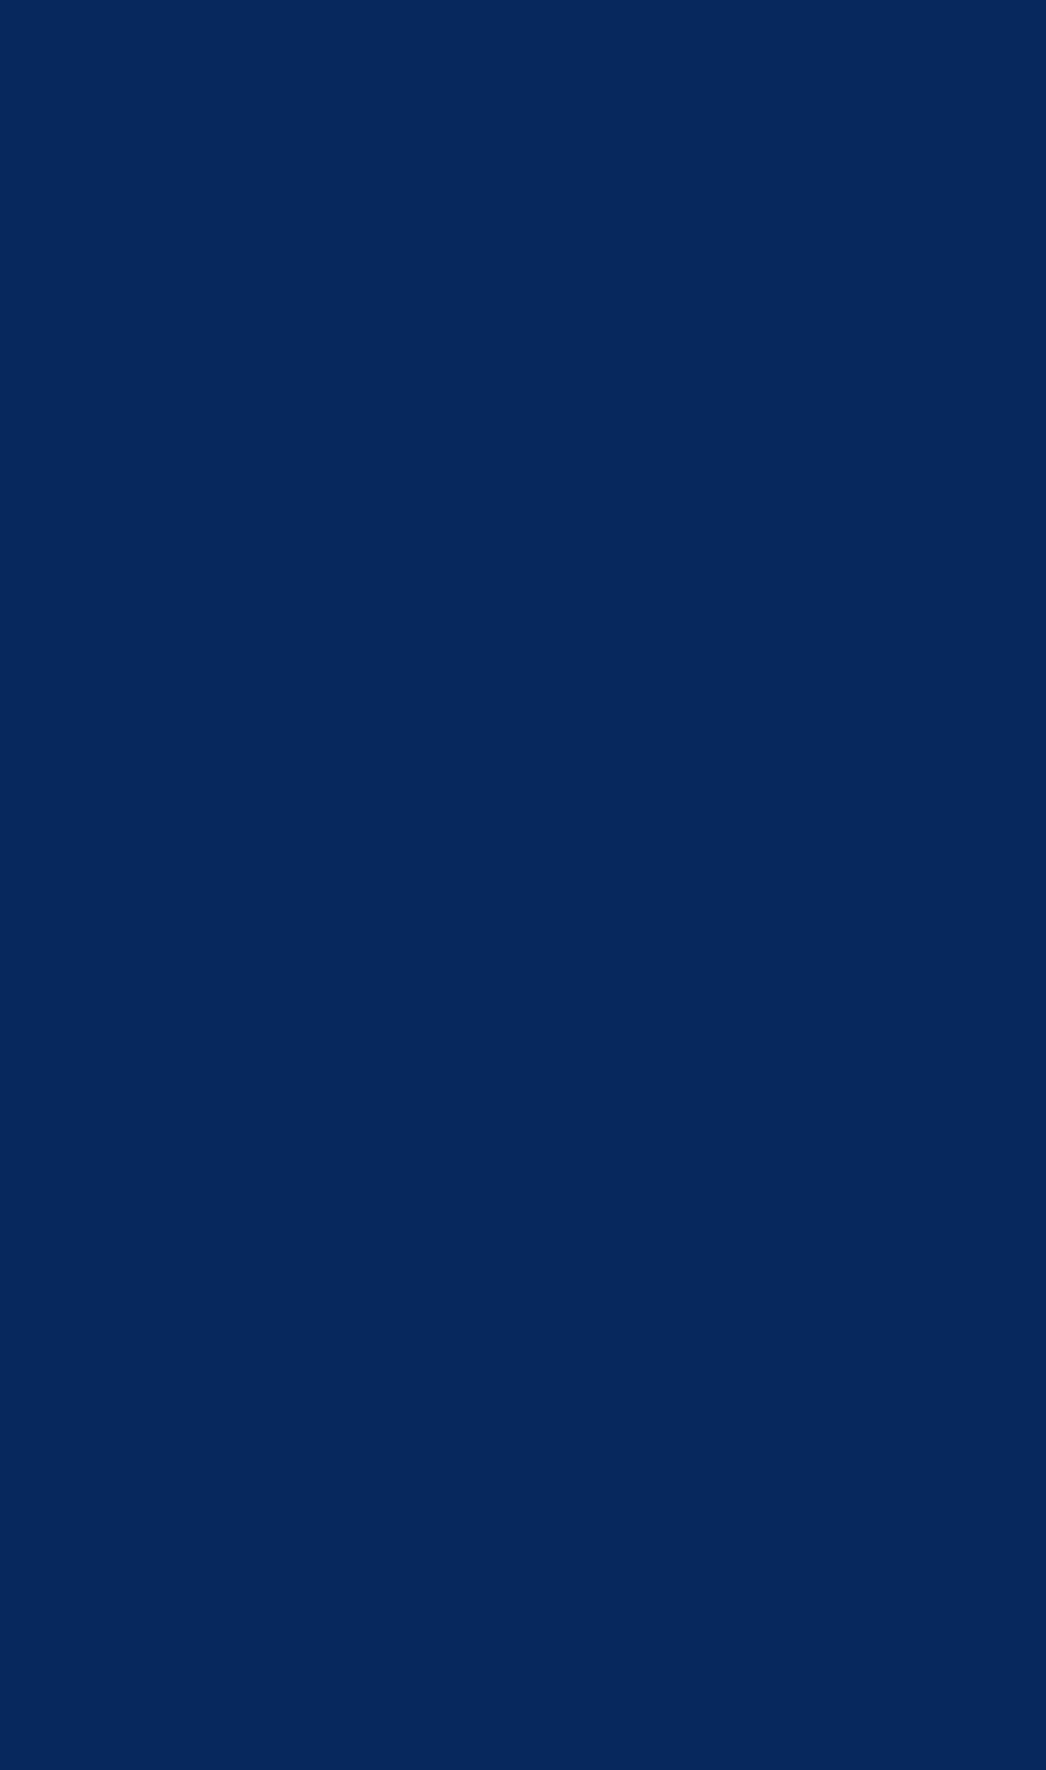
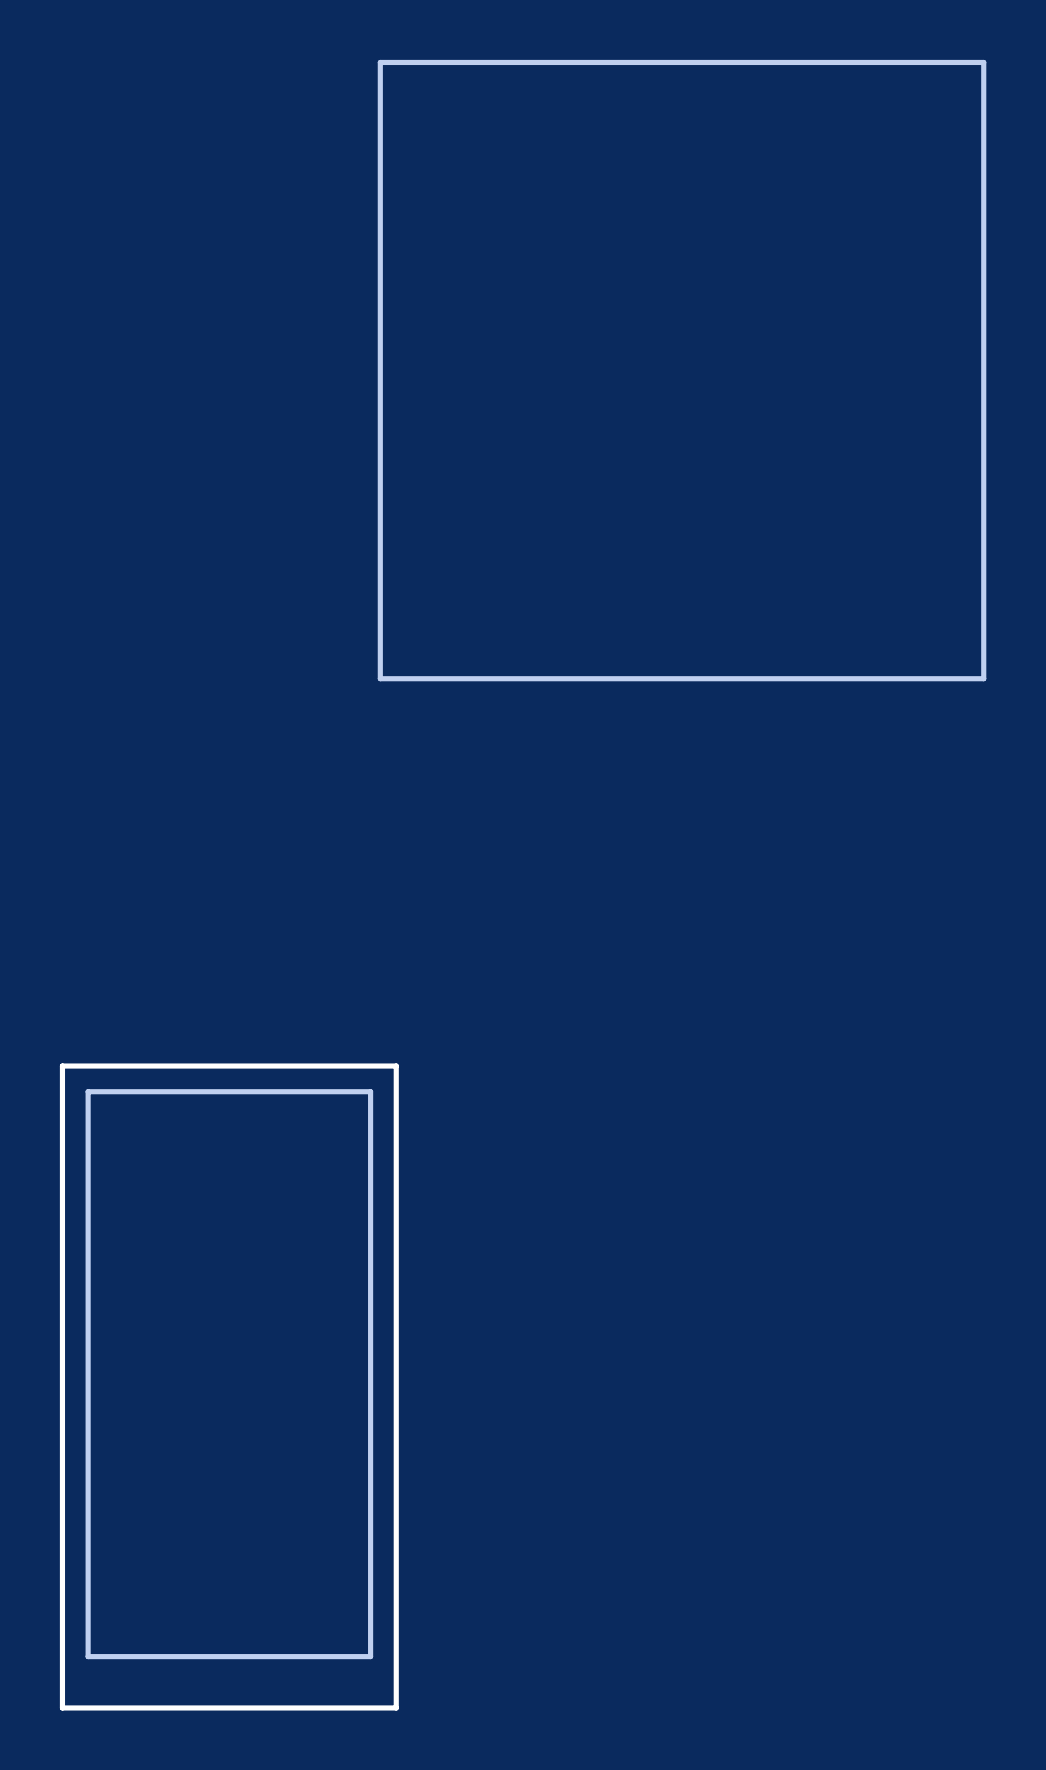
board edge: none -> (380, 62) (380, 678) (983, 678) (983, 62) (380, 62)
line: none -> (62, 1066) (62, 1707) (396, 1707) (396, 1066) (62, 1066)
board edge: none -> (88, 1091) (88, 1656) (370, 1656) (370, 1091) (88, 1091)

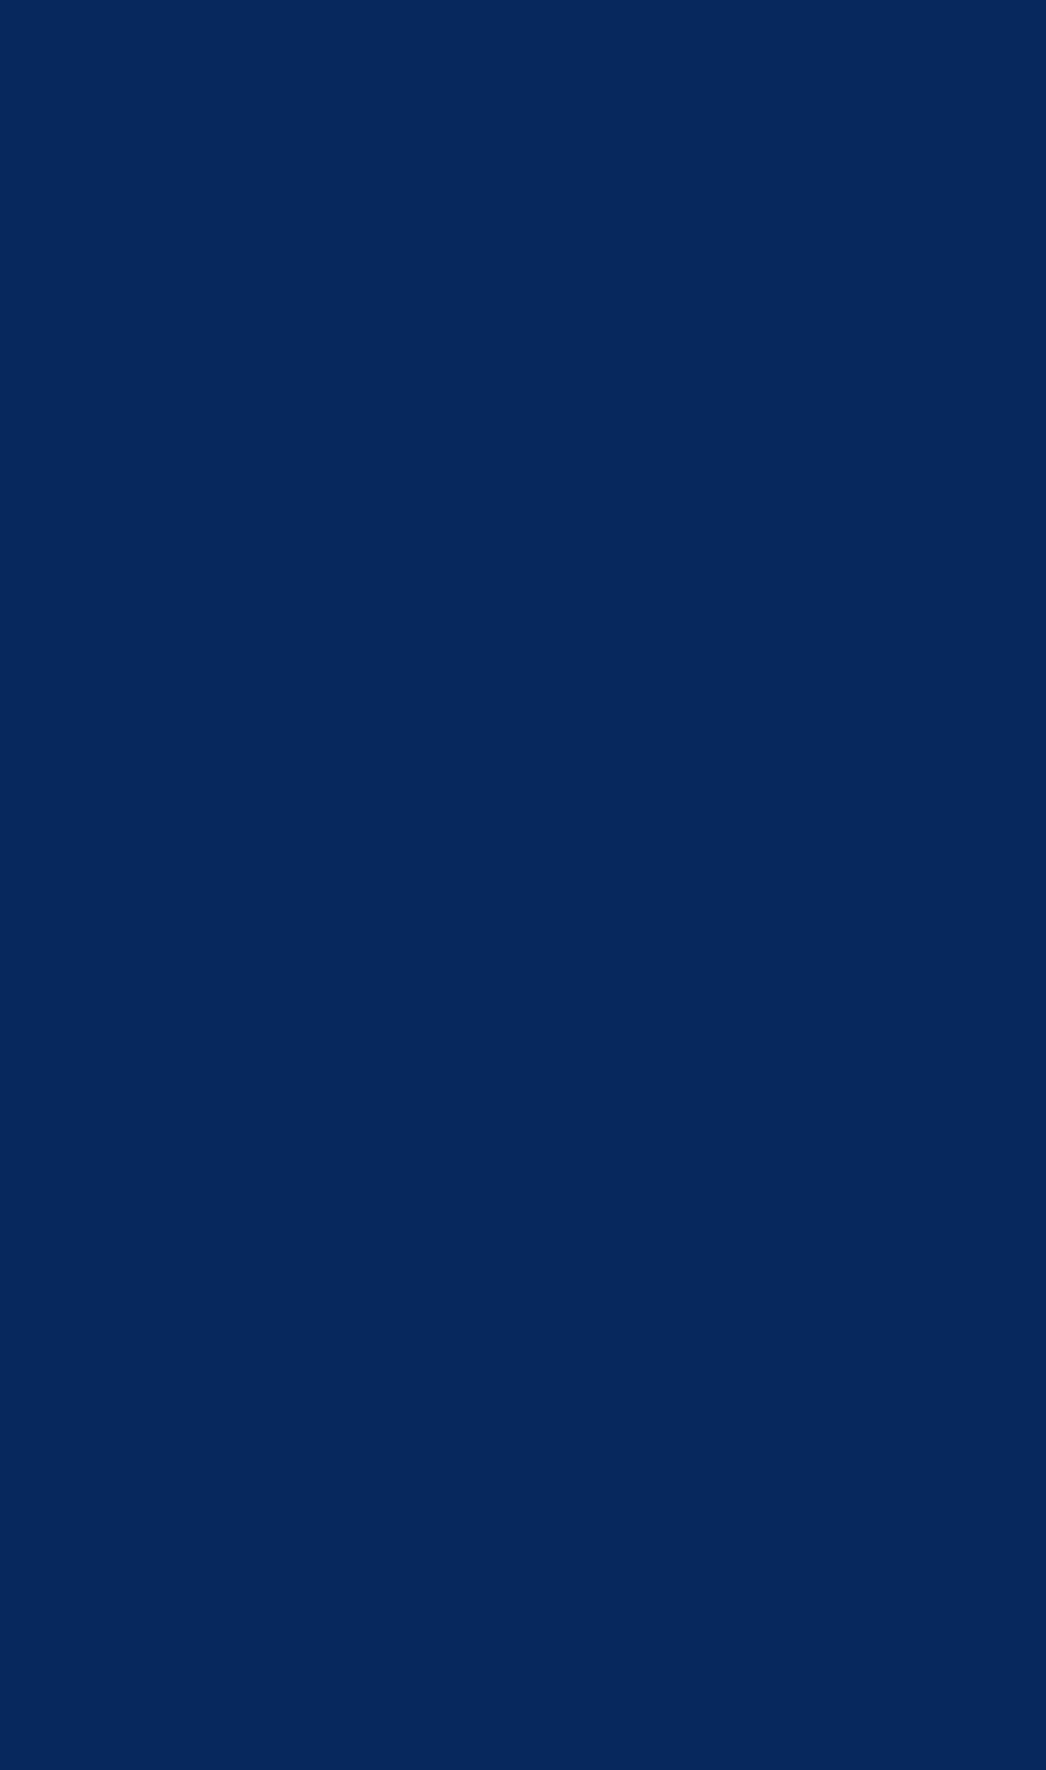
board edge: (380, 62) (380, 678) (983, 678) (983, 62) (380, 62) -> none
line: (62, 1066) (62, 1707) (396, 1707) (396, 1066) (62, 1066) -> none
board edge: (88, 1091) (88, 1656) (370, 1656) (370, 1091) (88, 1091) -> none

